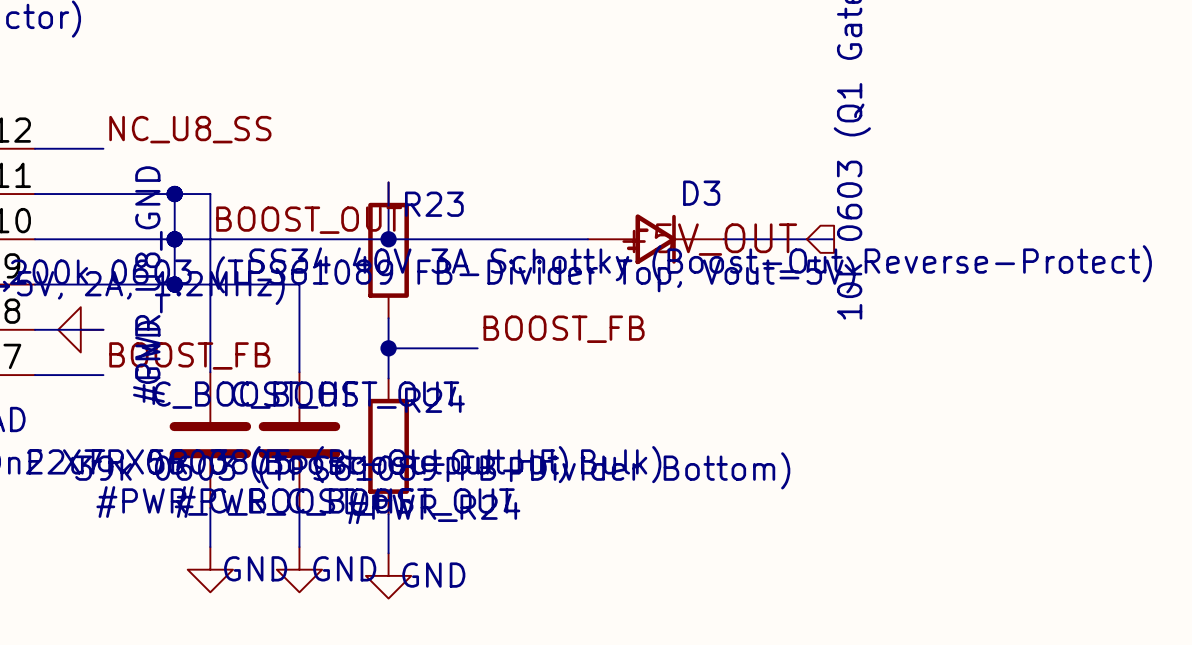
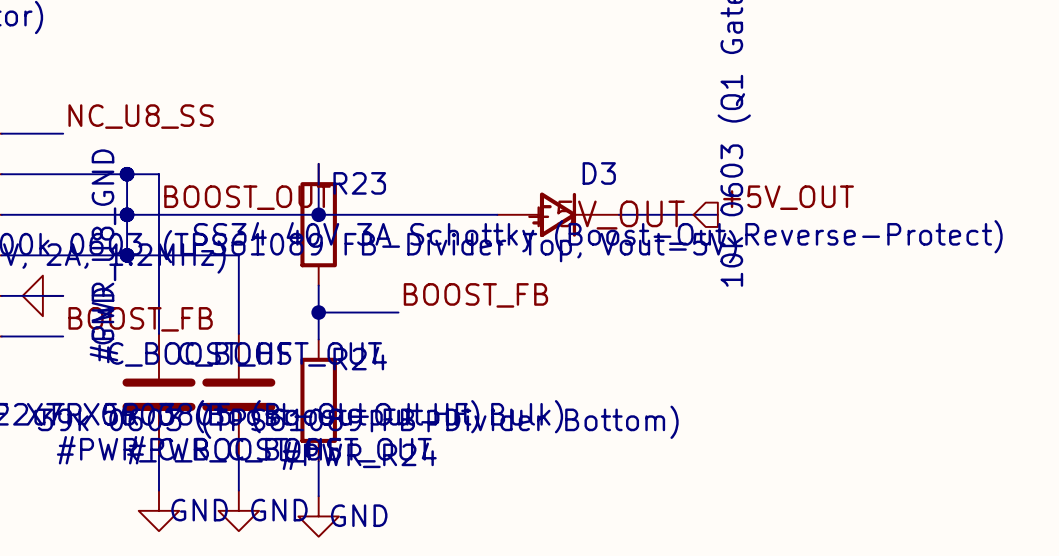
label: none -> +5V_OUT (788, 197)

